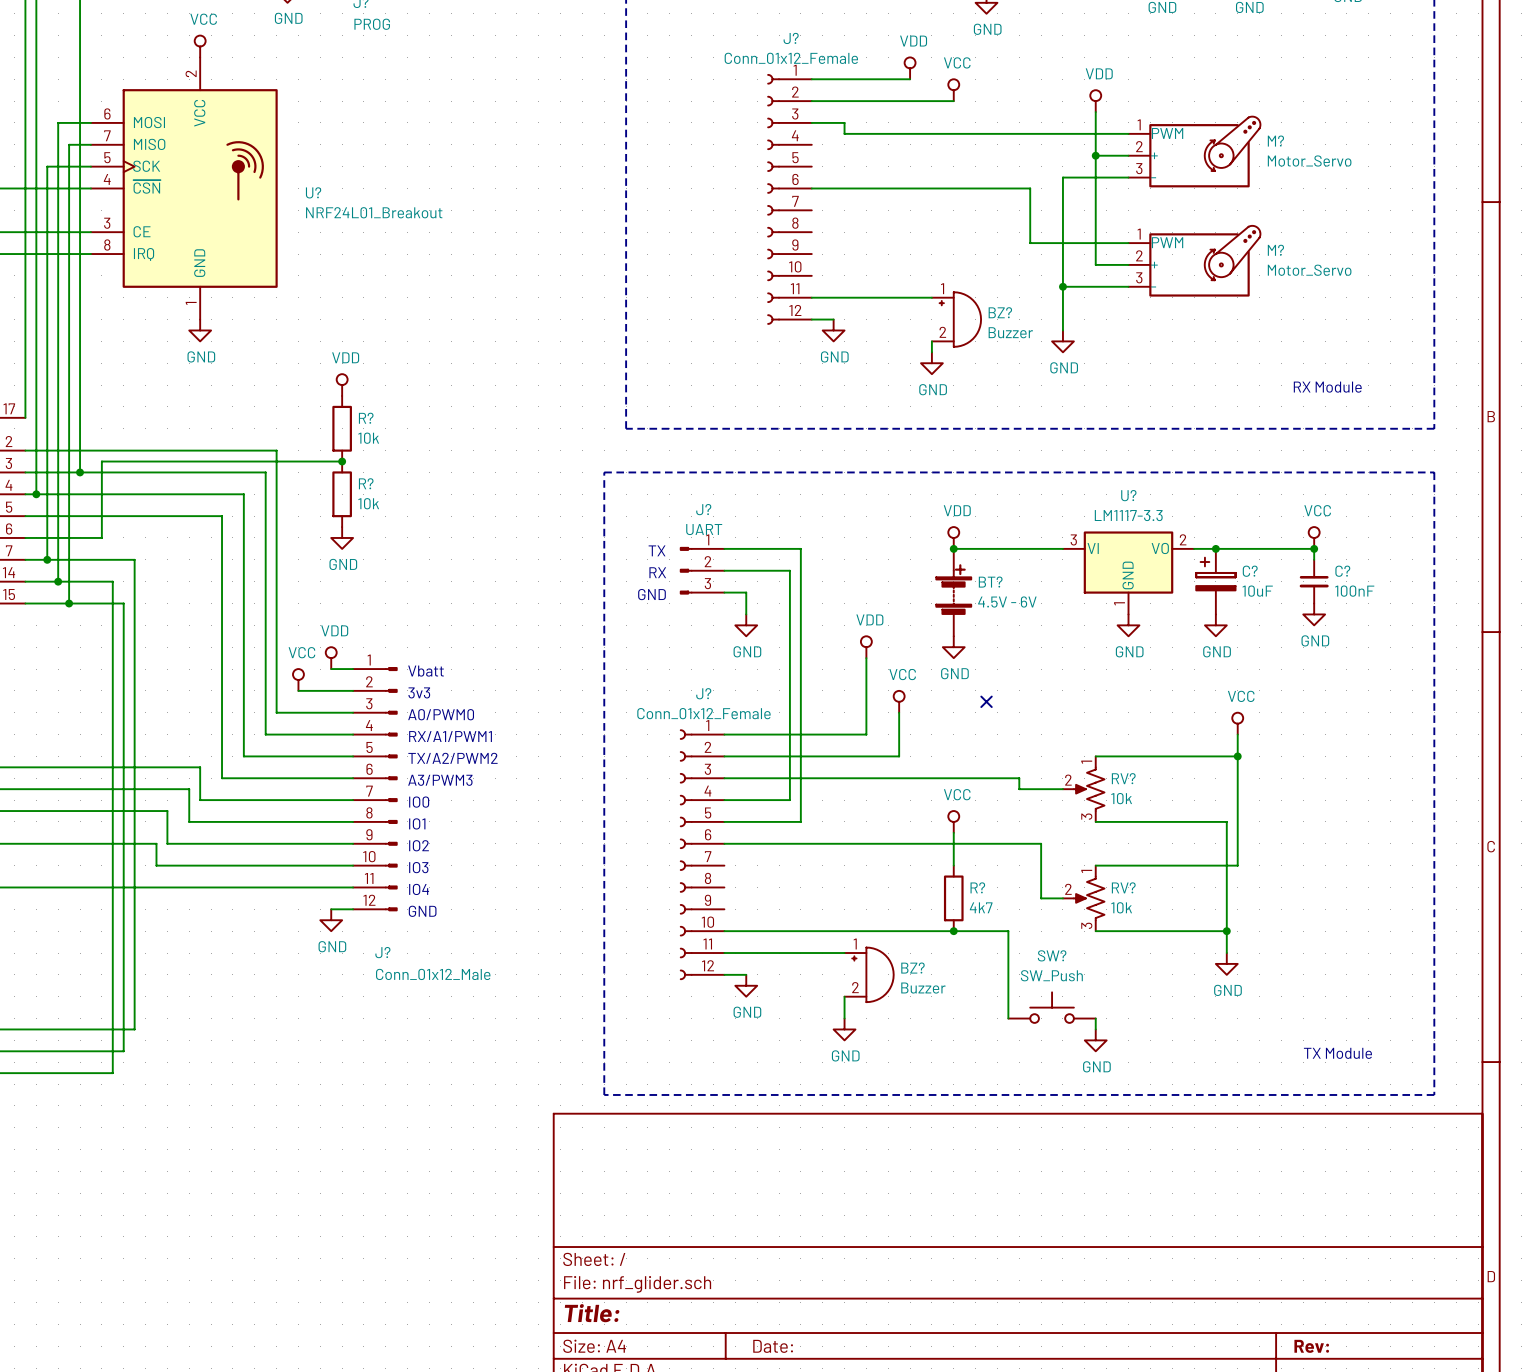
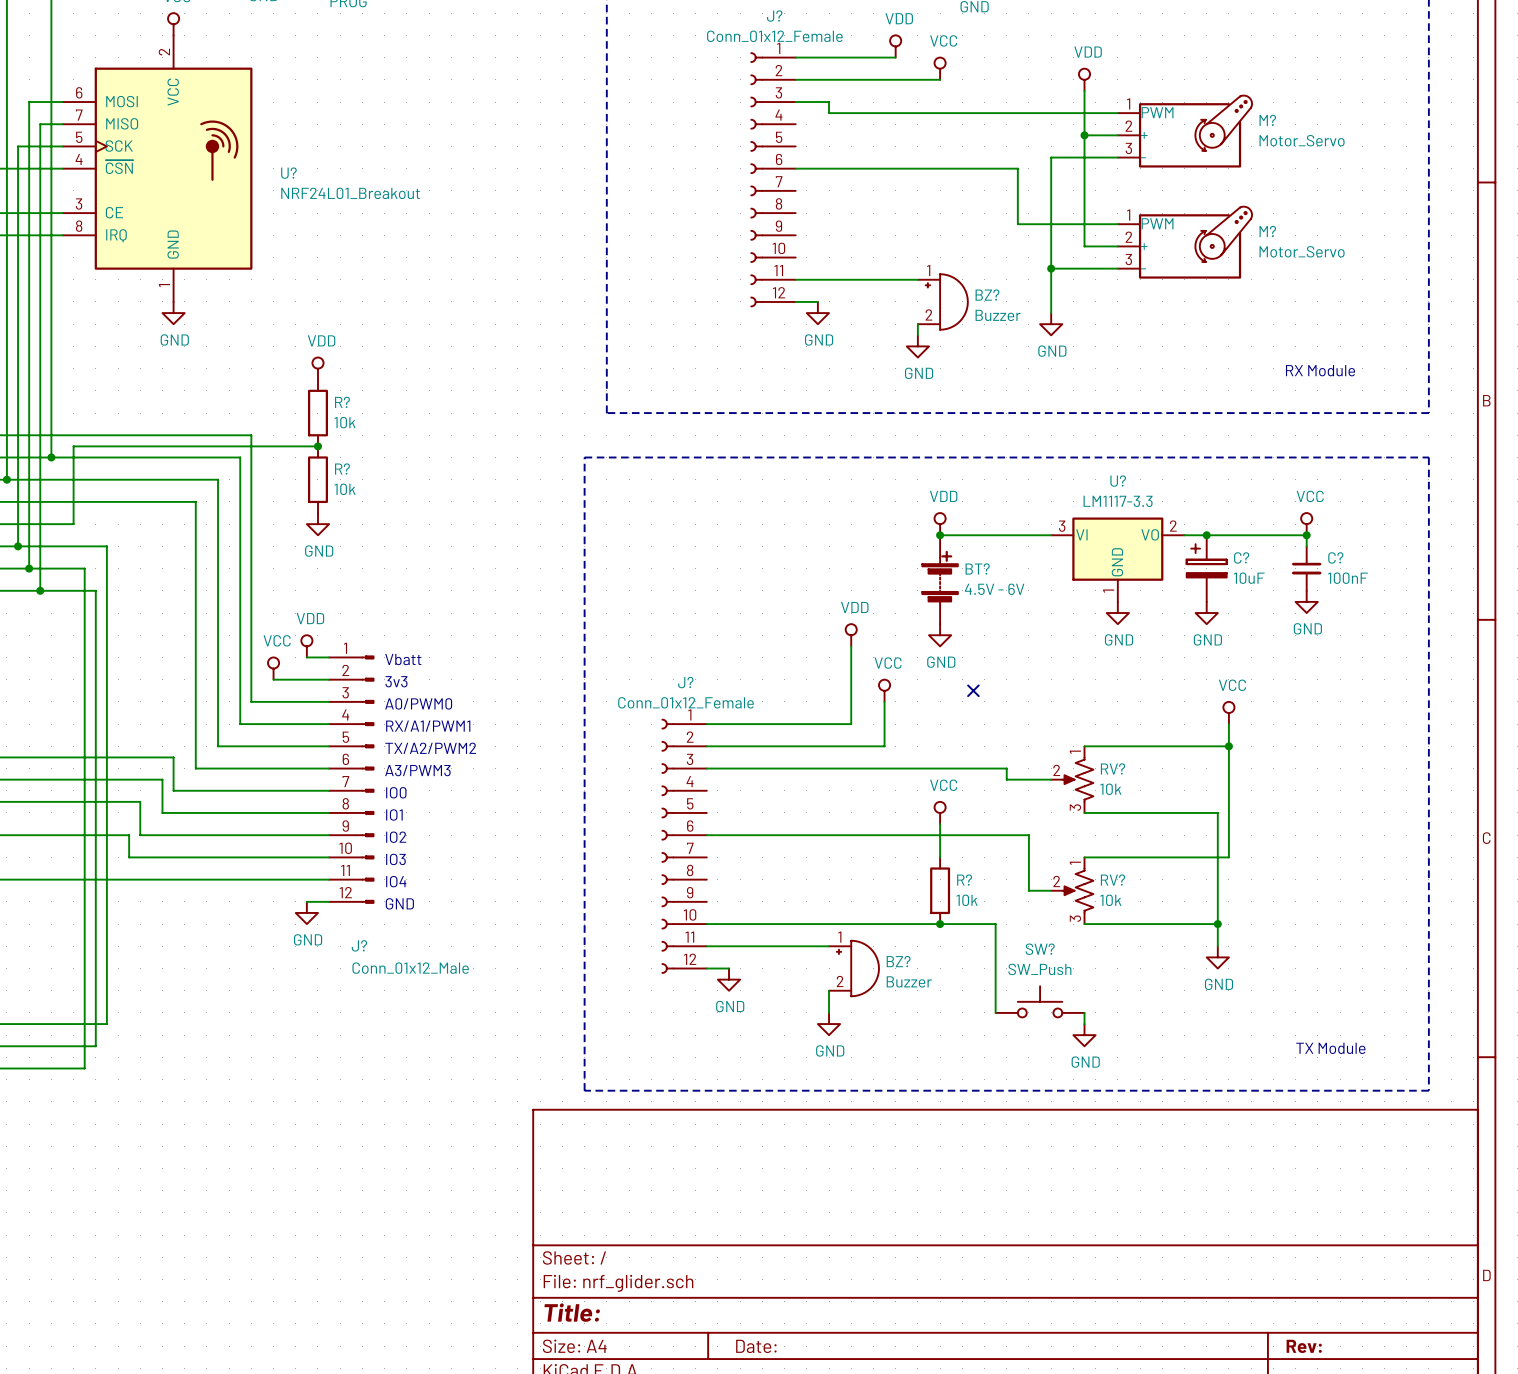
wire: (724, 548) (800, 548) (800, 821) (724, 821) -> none
text: TX (657, 550) -> none
J?: UART (702, 570) -> none
wire: (724, 570) (789, 570) (789, 800) (724, 800) -> none
text: RX (657, 572) -> none
wire: (724, 592) (746, 592) (746, 614) -> none
text: GND (651, 594) -> none
power symbol: GND (746, 625) -> none
R? value: 4k7 (981, 907) -> 10k (967, 900)

